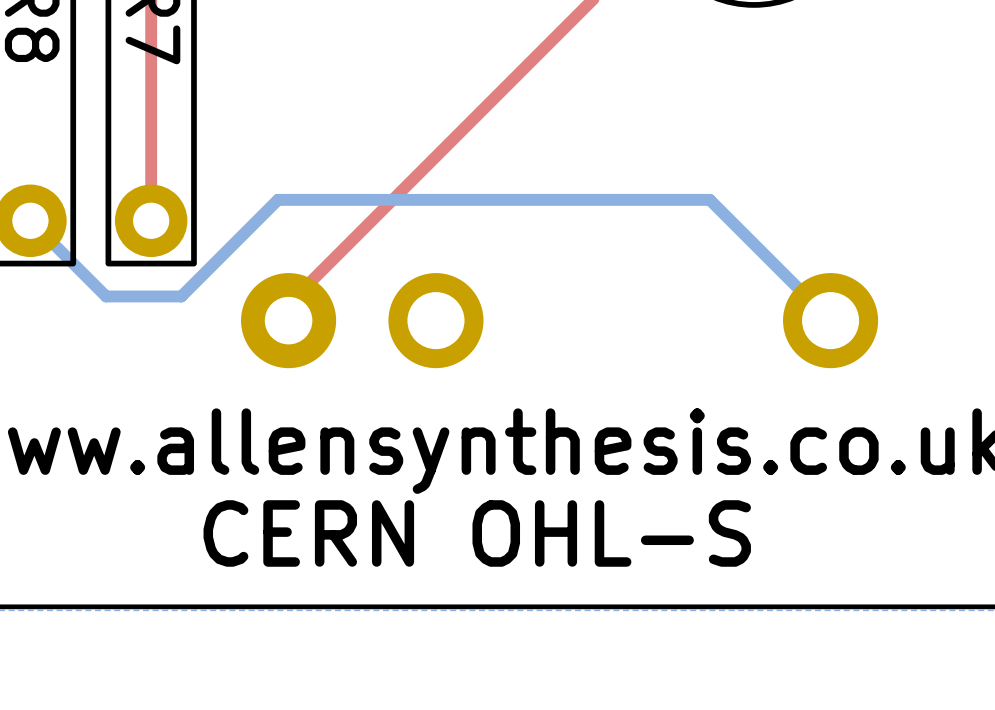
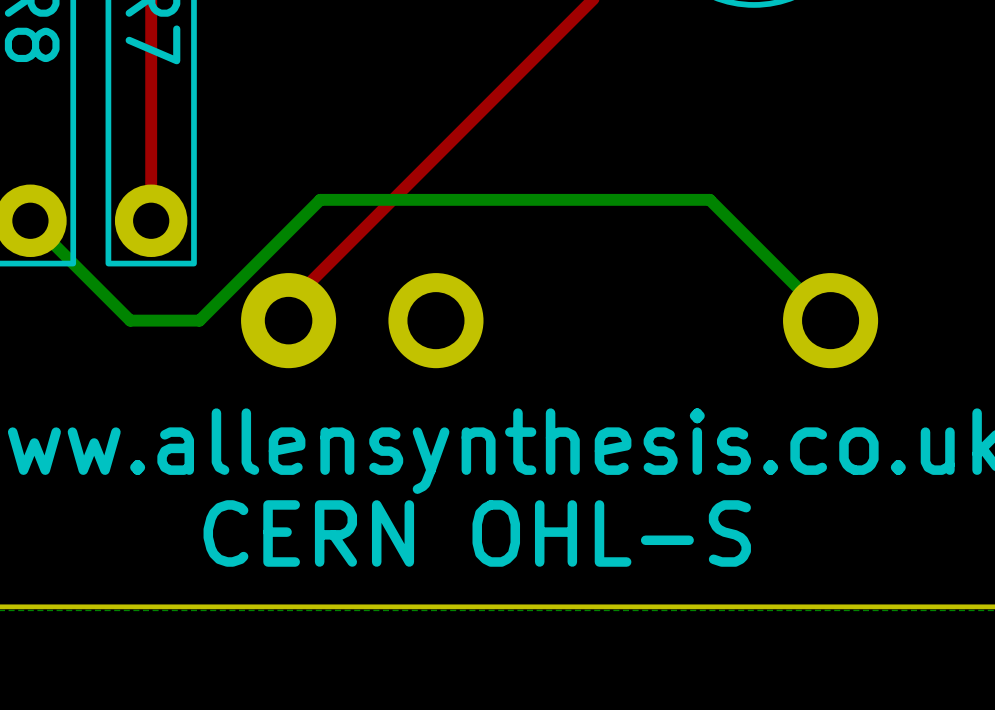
bottom track: (320, 199) (277, 199) (181, 296) (106, 296) -> (320, 199) (199, 320) (130, 320) (106, 296)

